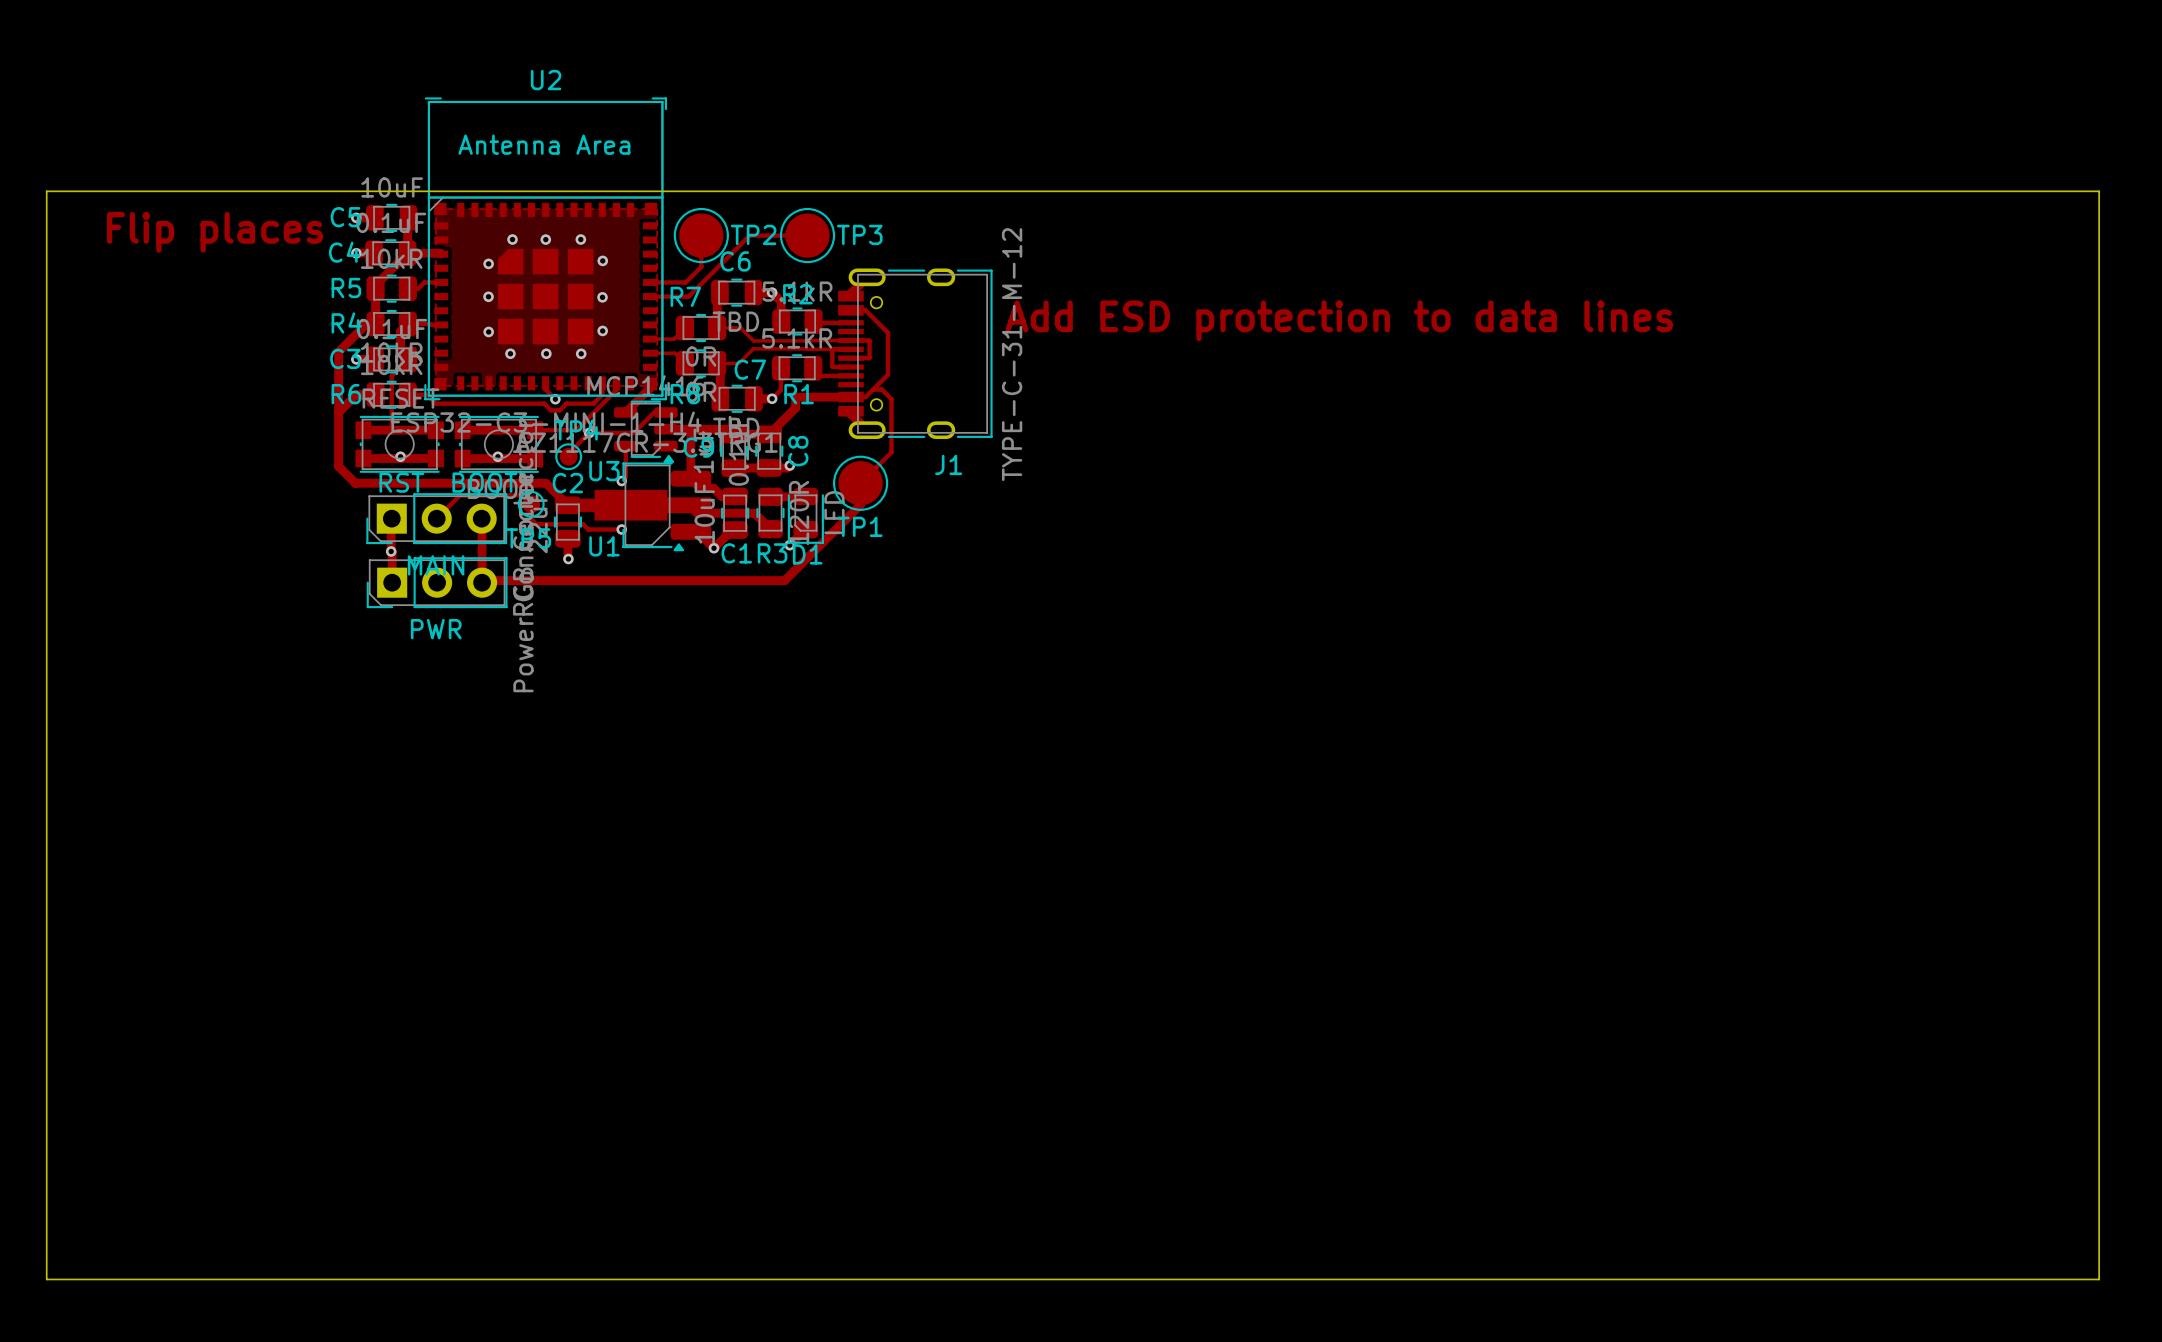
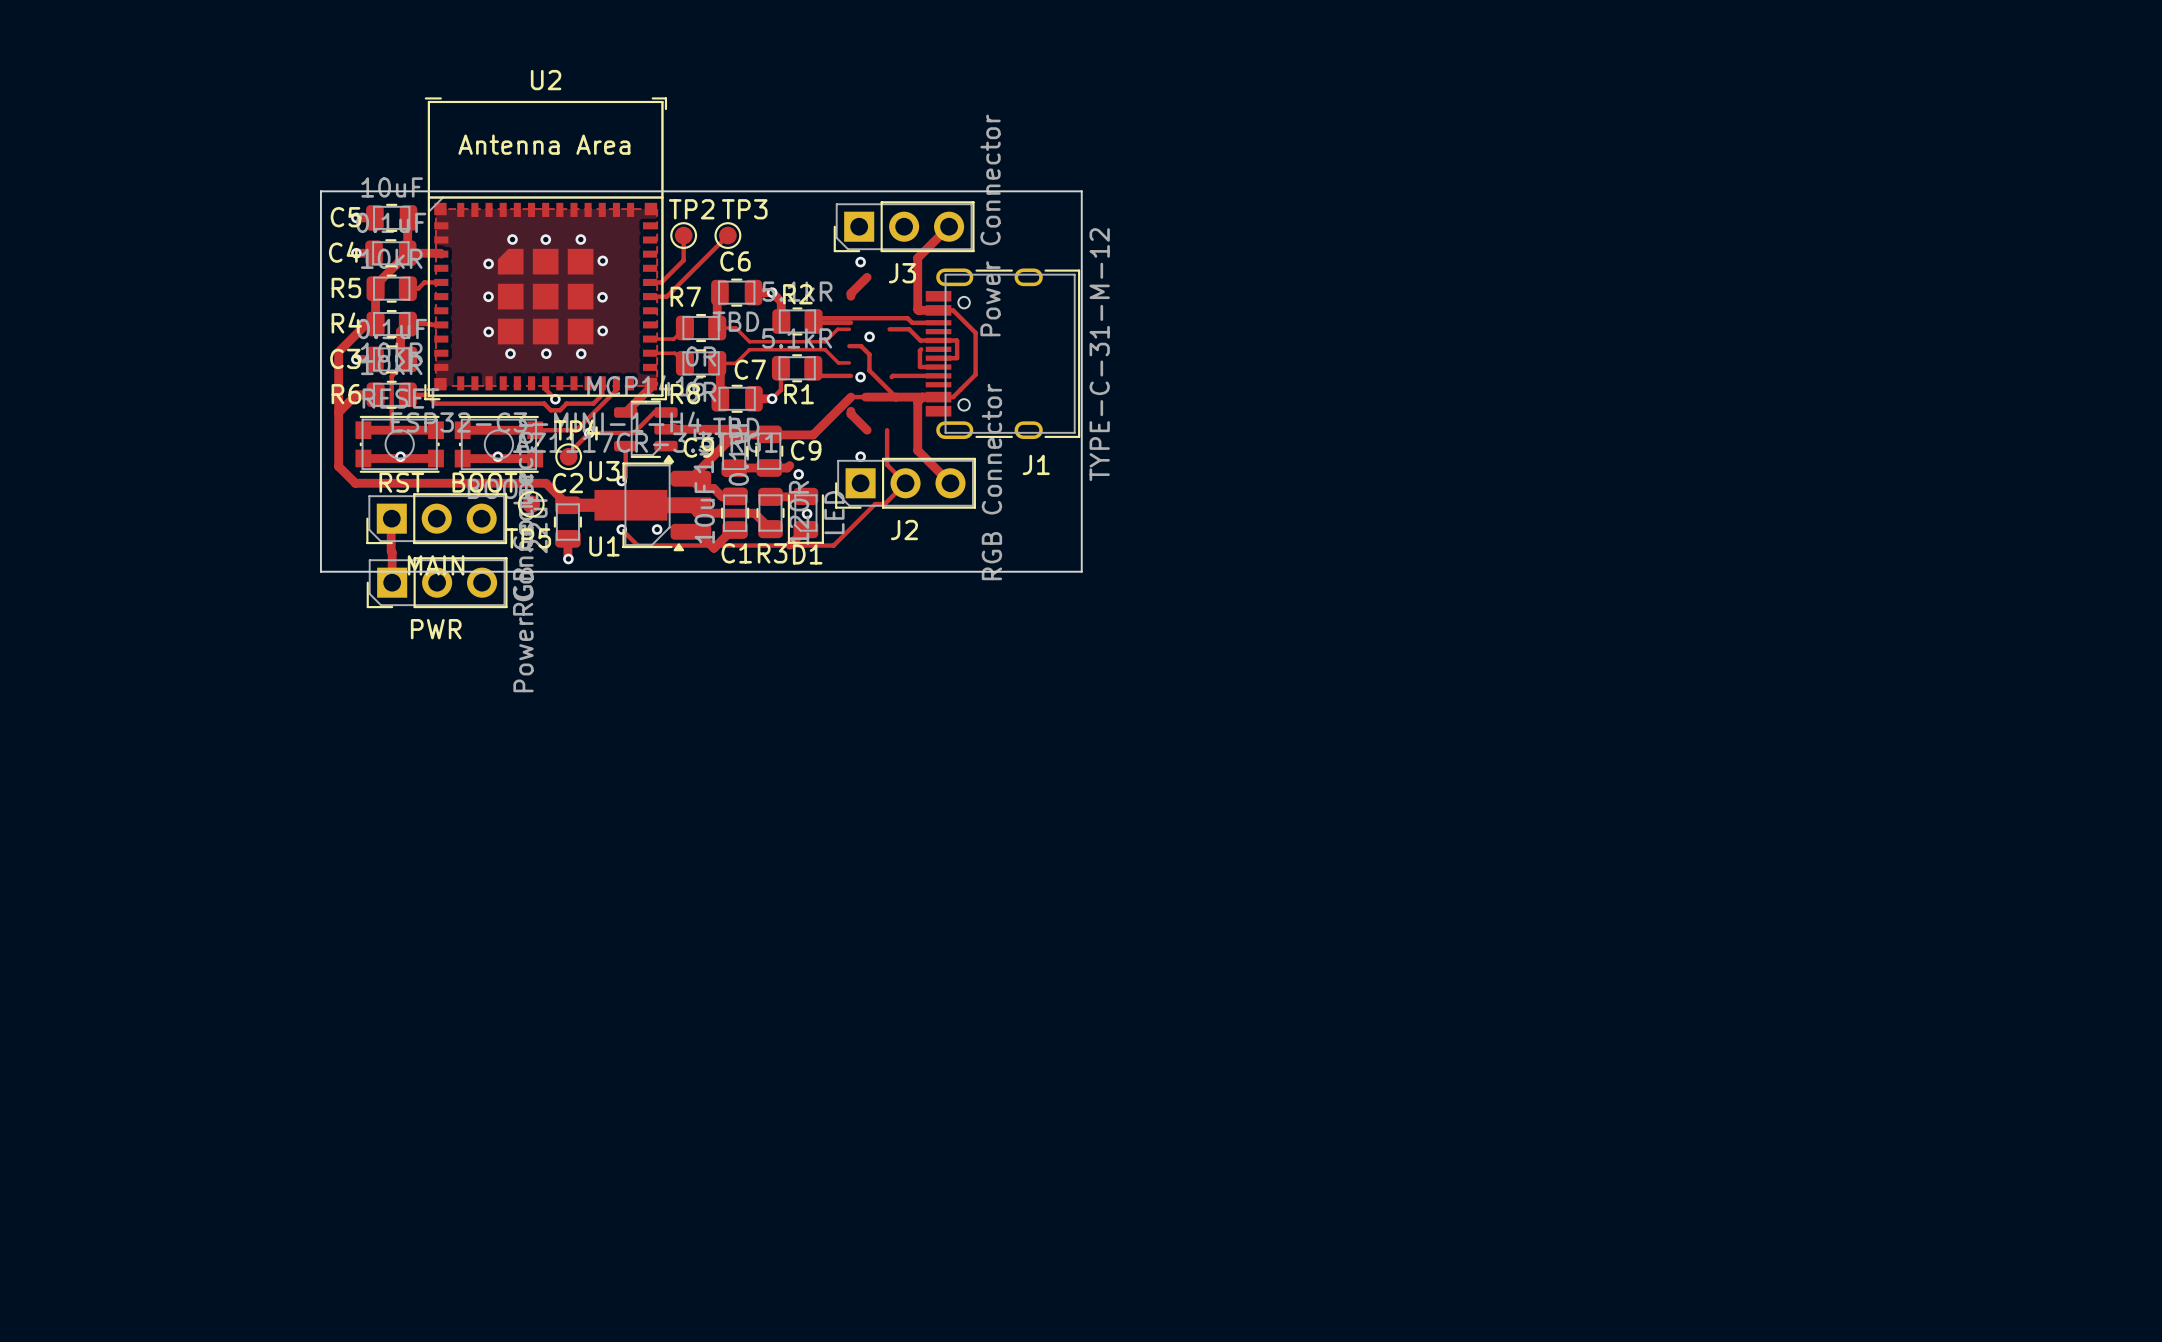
board edge: (320, 191) (46, 191) (46, 1279) (2099, 1279) (2099, 191) (1081, 191) -> (320, 191) (320, 571) (1081, 571) (1081, 191)
TP2 footprint: [673, 207, 729, 264] -> [670, 222, 698, 250]
TP3 footprint: [779, 207, 836, 264] -> [714, 222, 742, 250]
J3: none -> Power Connector (904, 226)
text: Flip places (215, 232) -> none
TP2 name position: TP2 (753, 234) -> TP2 (691, 209)
TP3 name position: TP3 (859, 234) -> TP3 (744, 209)
track: (701, 235) (701, 266) (685, 282) (661, 282) -> (683, 235) (683, 260) (661, 282)
track: (807, 235) (749, 235) (688, 296) (666, 296) -> (727, 235) (666, 296)
via: none -> (860, 262)
track: (850, 310) (865, 310) (888, 332) (888, 374) (865, 397) -> (949, 226) (917, 258) (917, 309) (953, 310) (975, 332) (975, 374) (953, 397) (865, 397)
text: Add ESD protection to data lines (1339, 320) -> none
track: none -> (813, 321) (816, 318) (907, 318) (912, 322) (938, 322)
track: (735, 328) (740, 328) (753, 340) (869, 340) (869, 358) (850, 358) -> (735, 328) (749, 341) (825, 341) (837, 329) (849, 329)
track: none -> (889, 329) (909, 329) (920, 340) (957, 340) (956, 358) (938, 358)
via: none -> (869, 336)
track: none -> (849, 346) (861, 346) (869, 354) (869, 370) (895, 397)
track: none -> (921, 349) (919, 366) (938, 367)
J1 position: (915, 353) -> (1002, 353)
track: (735, 363) (738, 363) (753, 348) (850, 349) (832, 349) (832, 367) (850, 367) -> (735, 363) (749, 349) (825, 349) (838, 362) (849, 362)
track: none -> (938, 375) (891, 377)
via: none -> (860, 377)
track: (873, 389) (881, 389) (891, 399) (891, 452) (860, 483) (860, 504) (784, 580) (484, 580) (482, 582) (481, 518) -> none
track: (850, 397) (795, 397) (795, 407) (769, 434) (734, 434) -> (850, 397) (813, 434) (734, 434) (690, 478)
track: none -> (922, 397) (917, 401) (917, 450) (950, 483)
track: (692, 429) (690, 430) (690, 478) -> none
C8 name: C8 (798, 451) -> C9 (806, 450)
via: none -> (860, 456)
via position: (789, 465) -> (798, 474)
TP1: (860, 483) -> none
J2: none -> RGB Connector (905, 483)
via: none -> (807, 513)
track: (436, 518) (459, 495) (522, 495) (531, 504) (531, 518) (536, 524) (583, 524) (588, 529) (621, 529) -> (887, 430) (887, 464) (905, 483) (884, 504) (875, 504) (833, 545) (637, 545) (621, 529)
via: none -> (657, 529)
via: (789, 545) -> none
via: (714, 548) -> none
via: (391, 551) -> none

